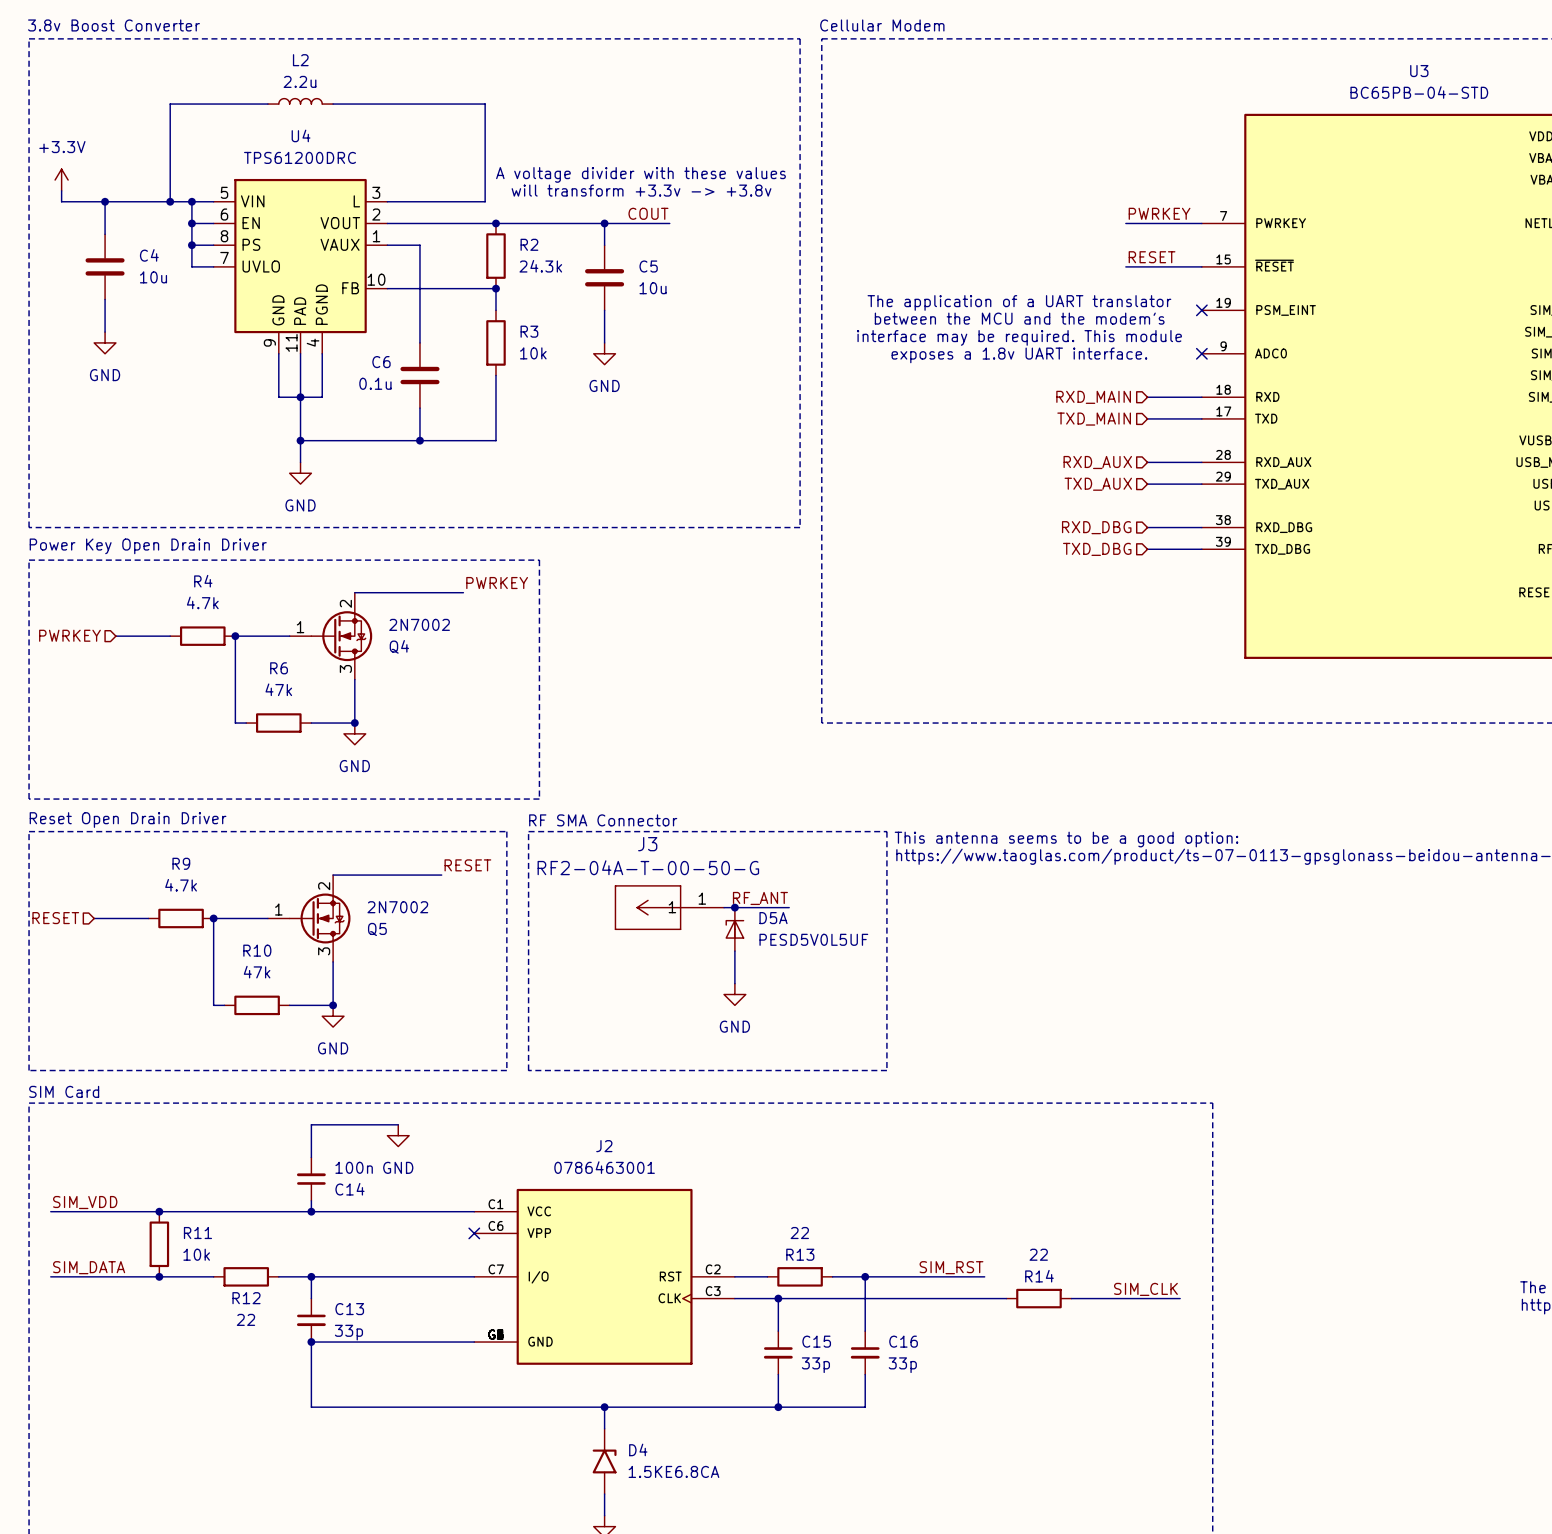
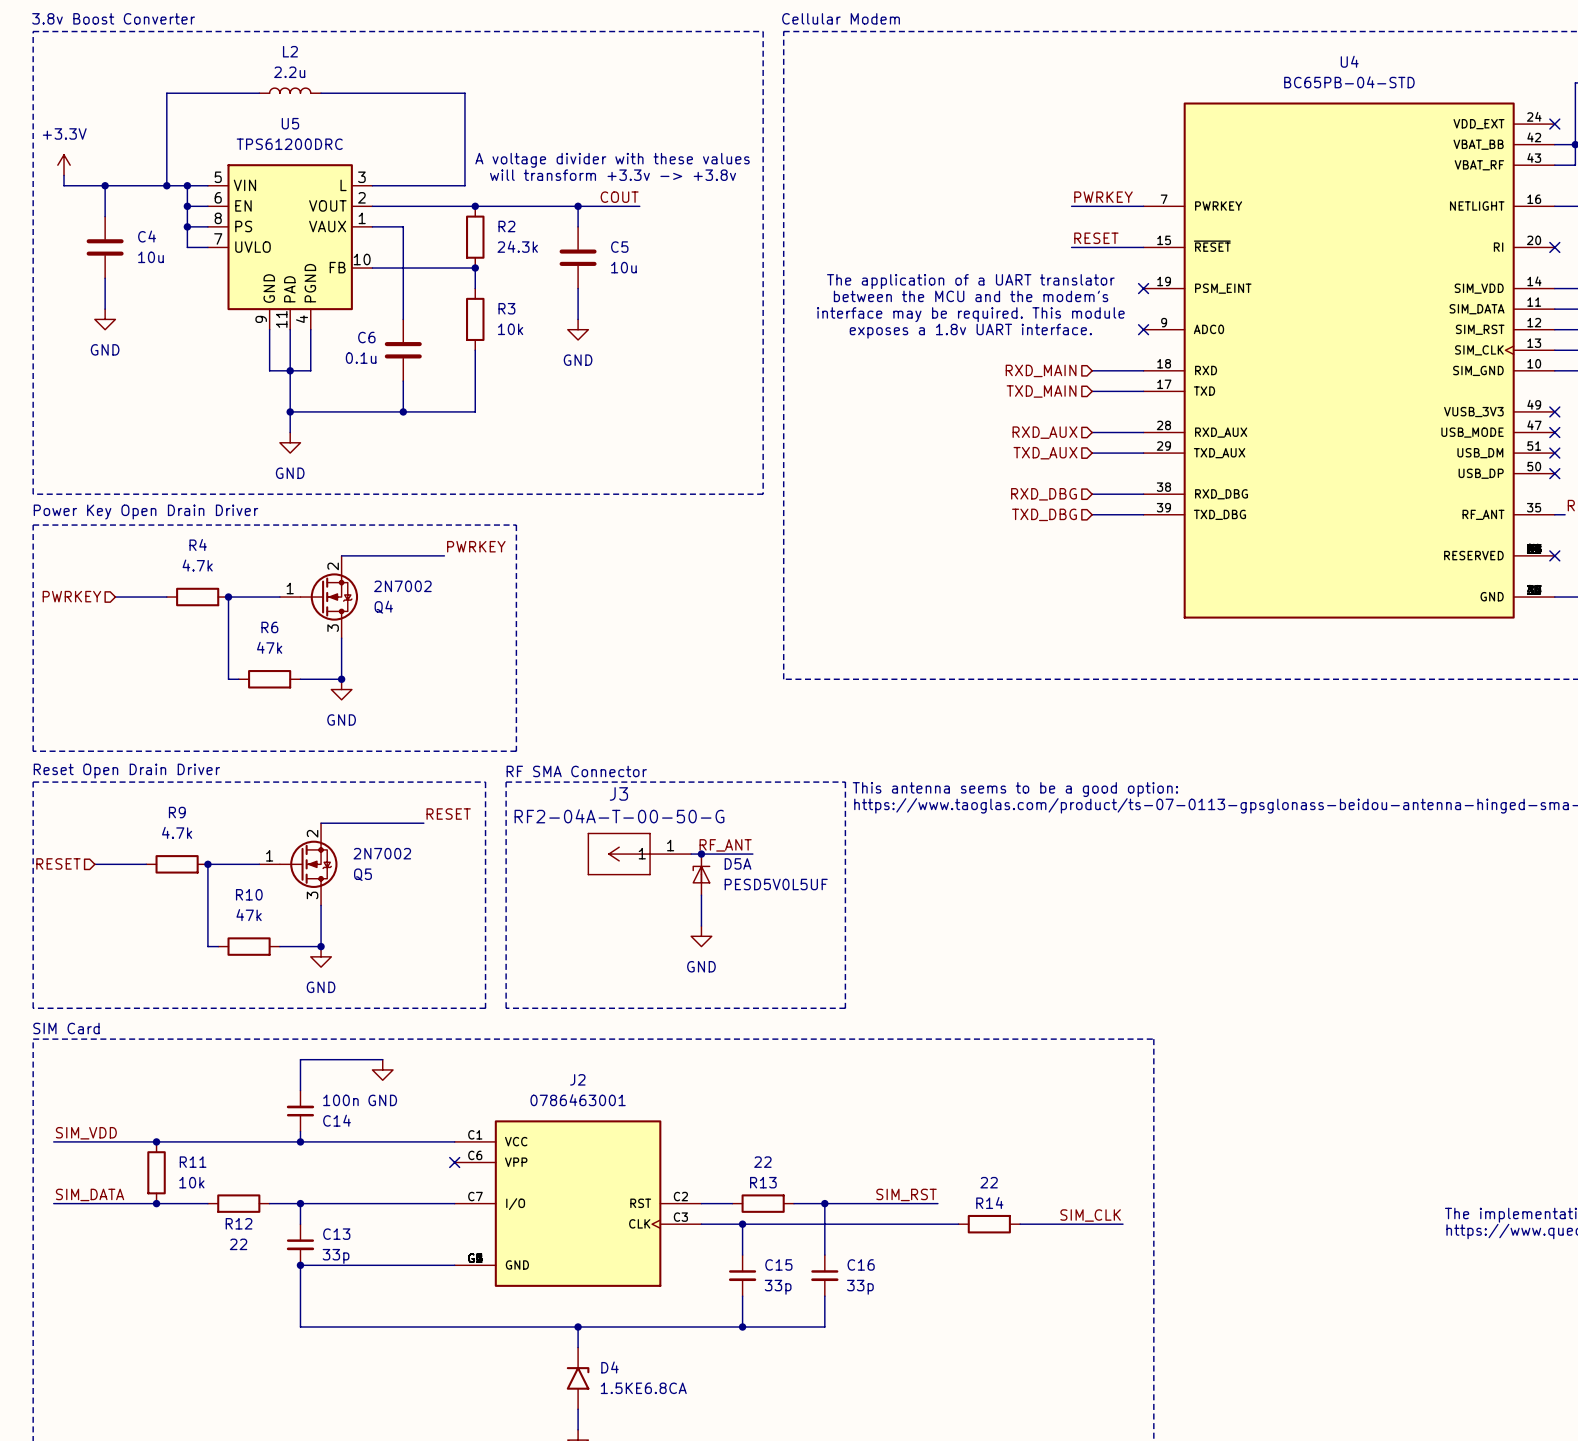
U3 name: U3 (1419, 71) -> U4 (1349, 61)
U4 name: U4 (301, 135) -> U5 (290, 123)

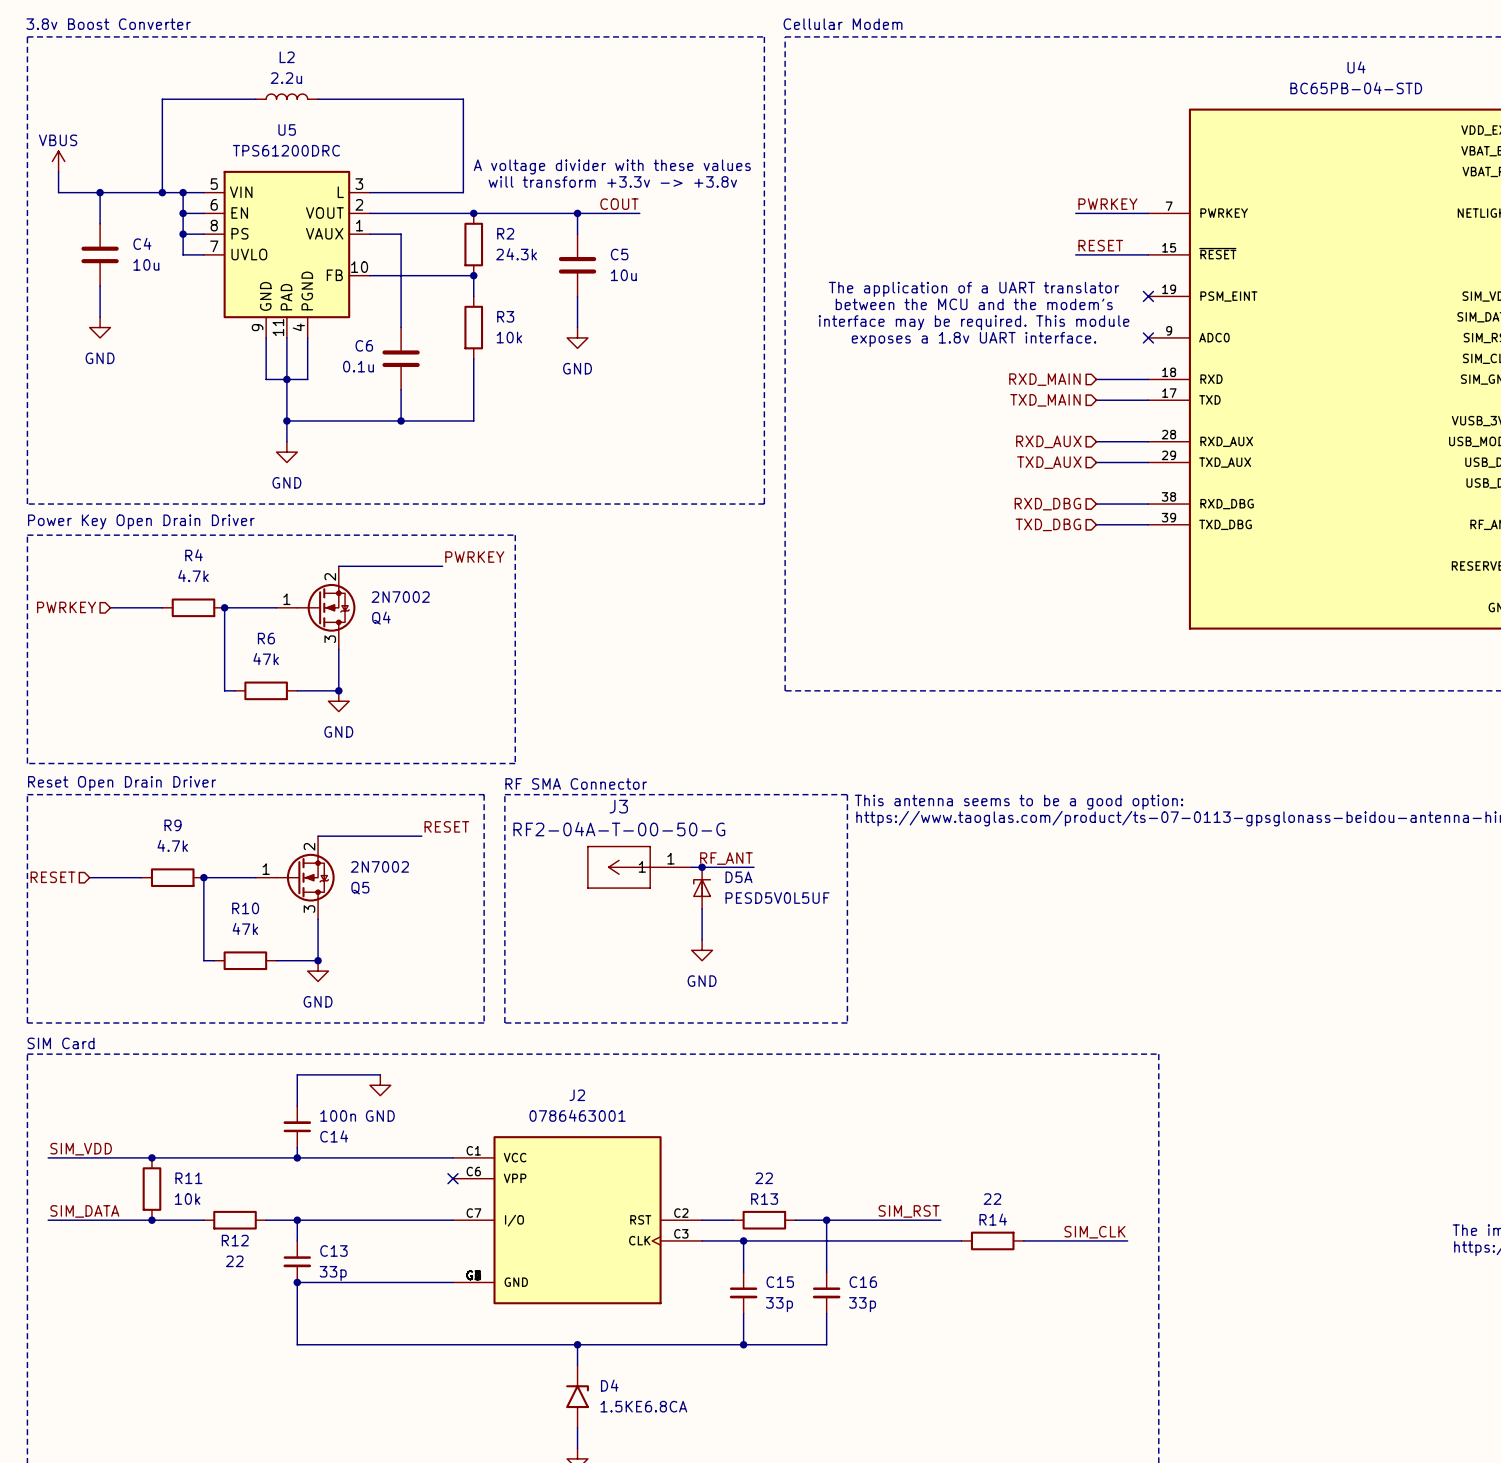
power symbol: none -> VBUS (58, 161)
power symbol: +3.3V (64, 165) -> none

